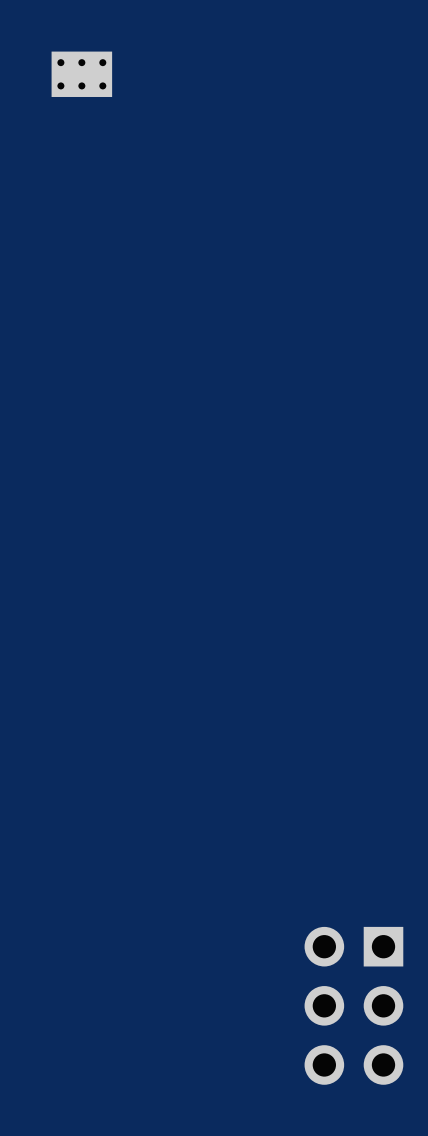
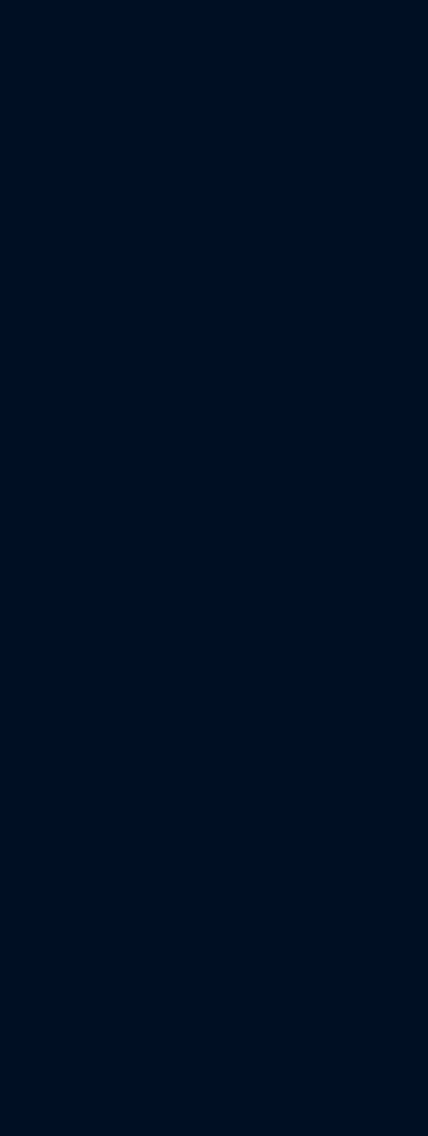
part: (81, 74) -> none
part: (353, 1005) -> none

